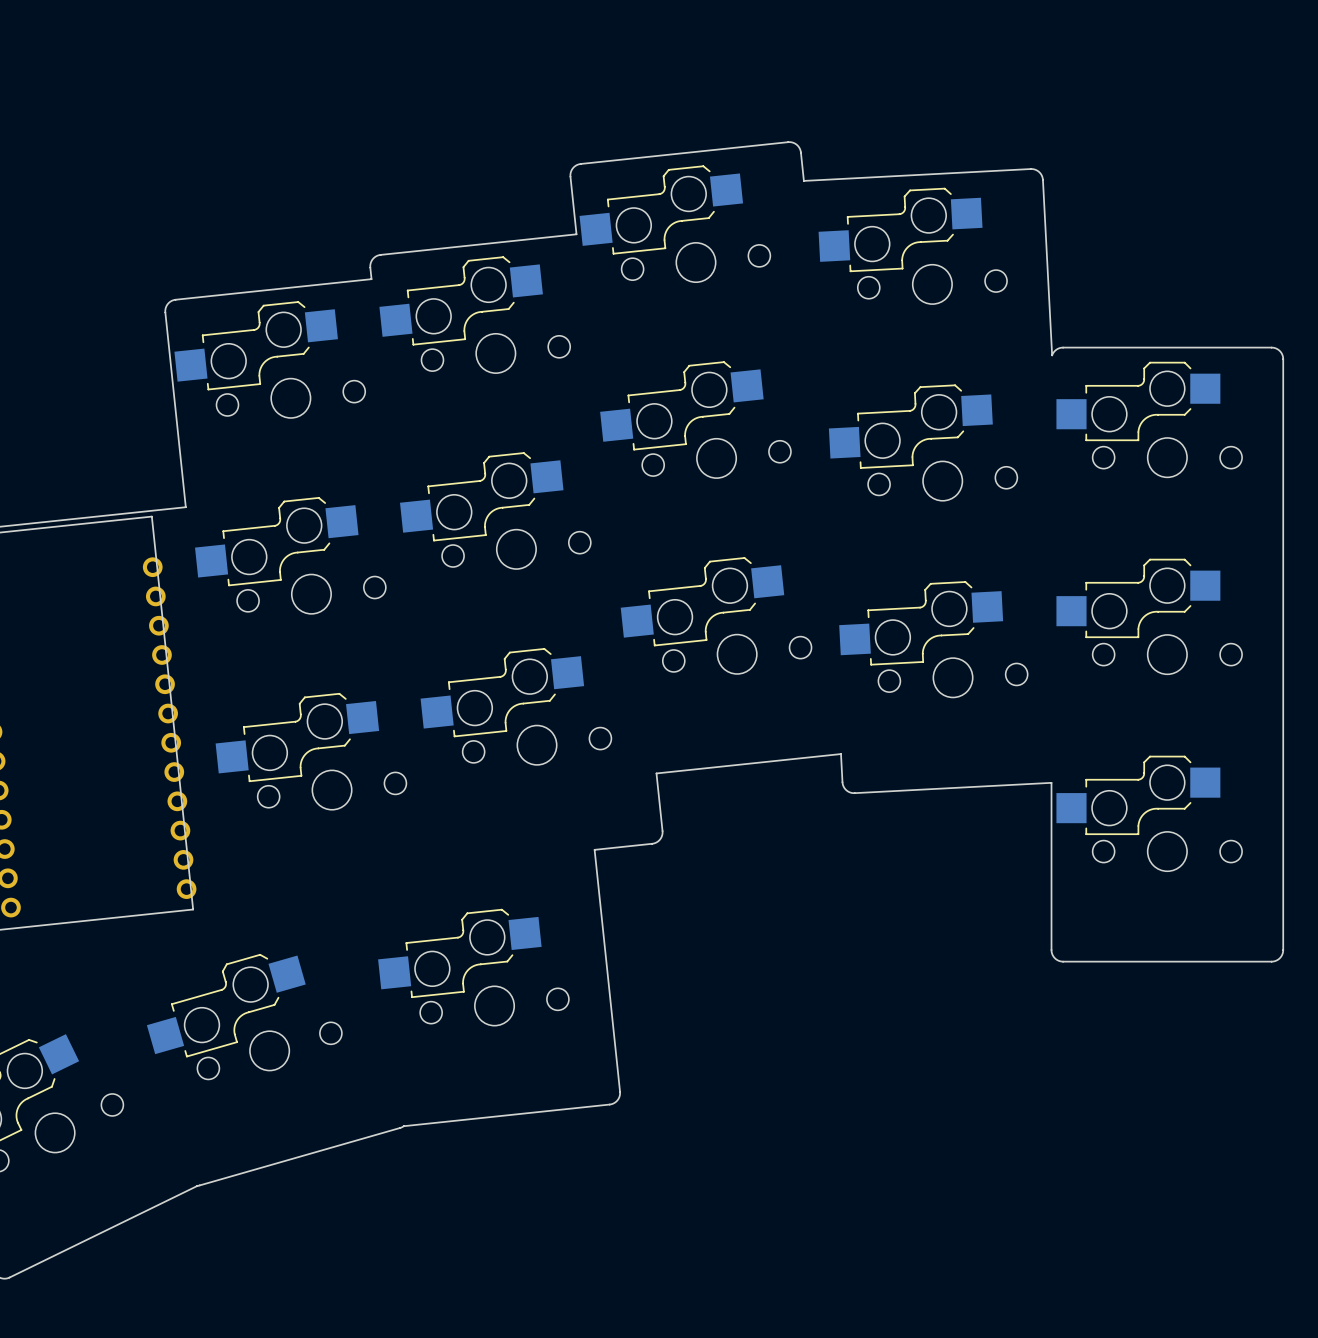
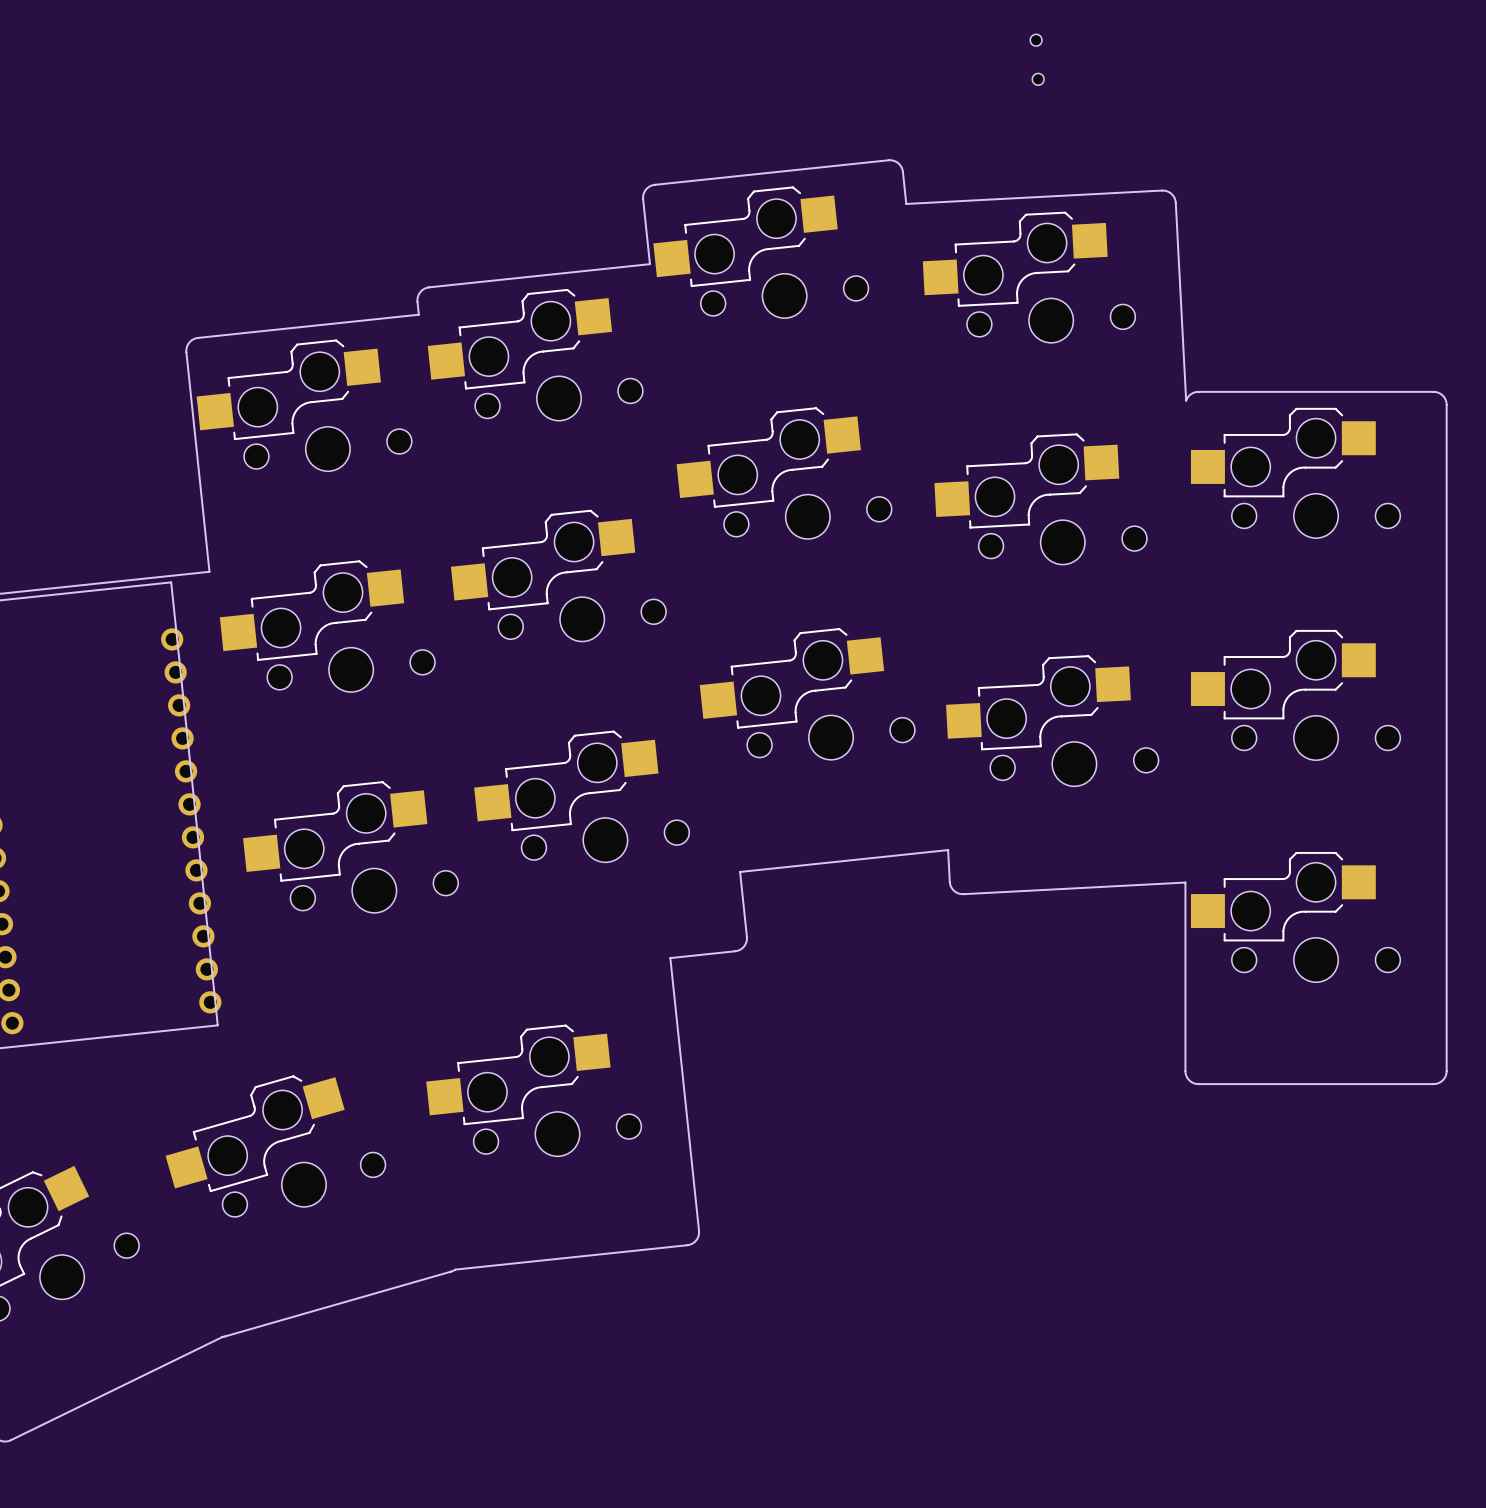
part: none -> (1037, 59)

